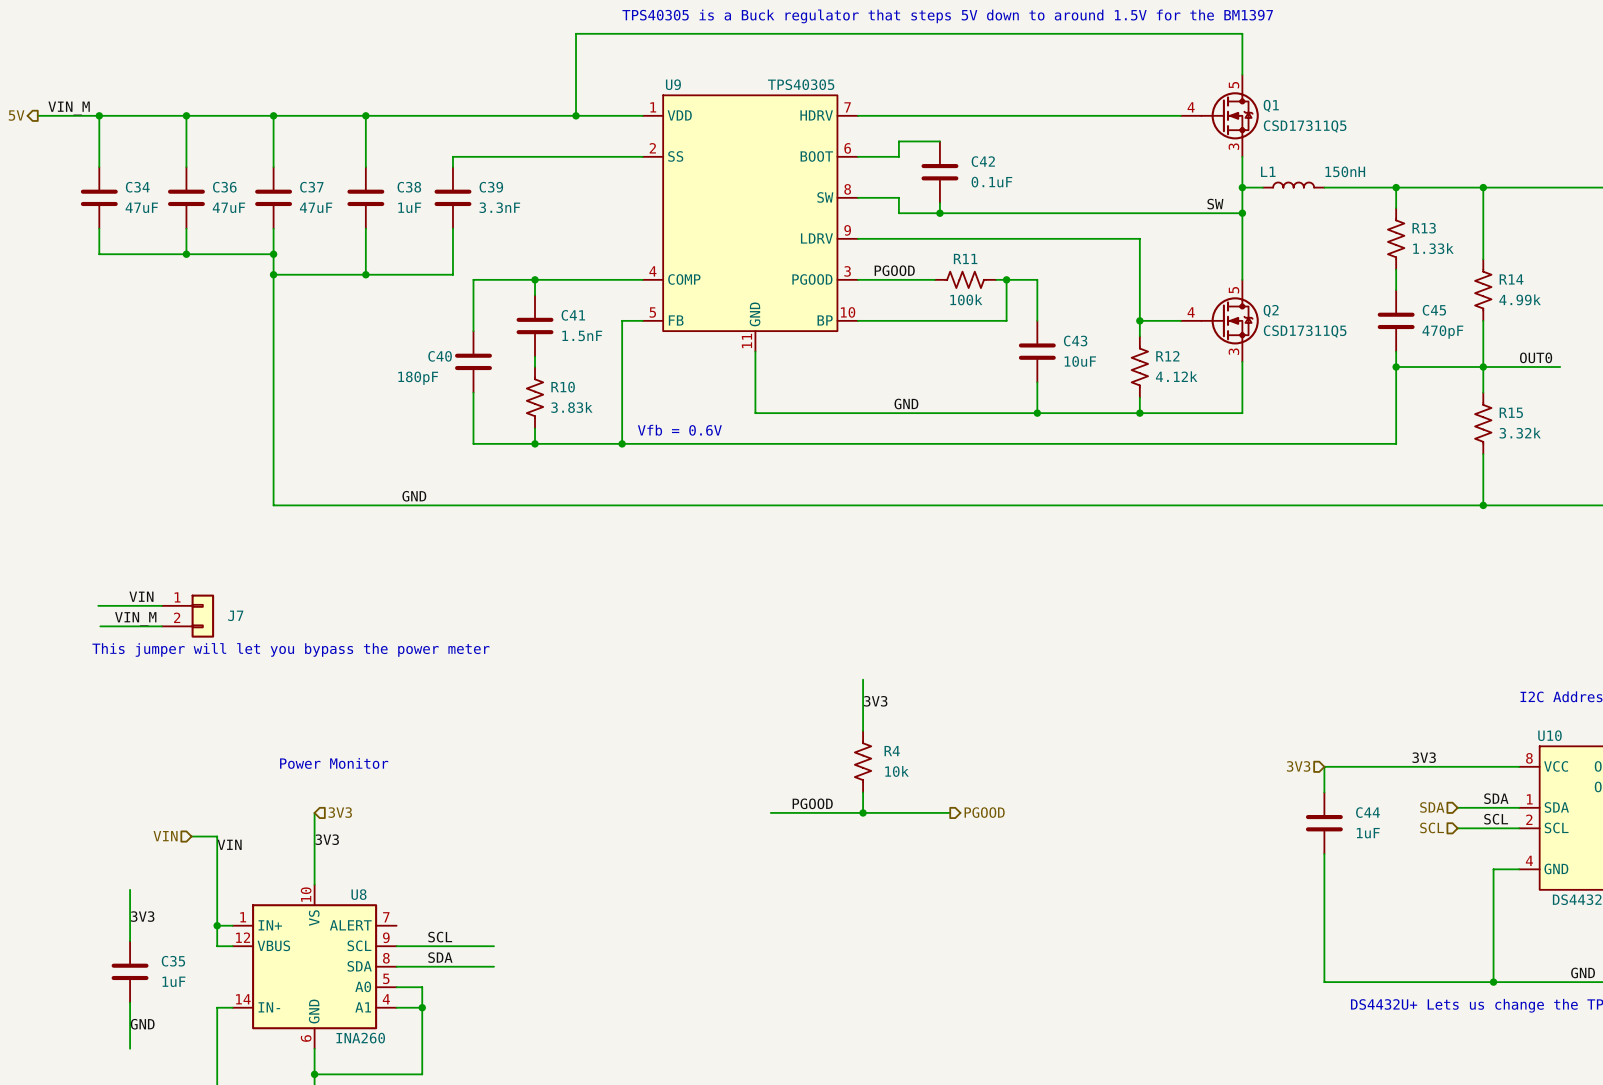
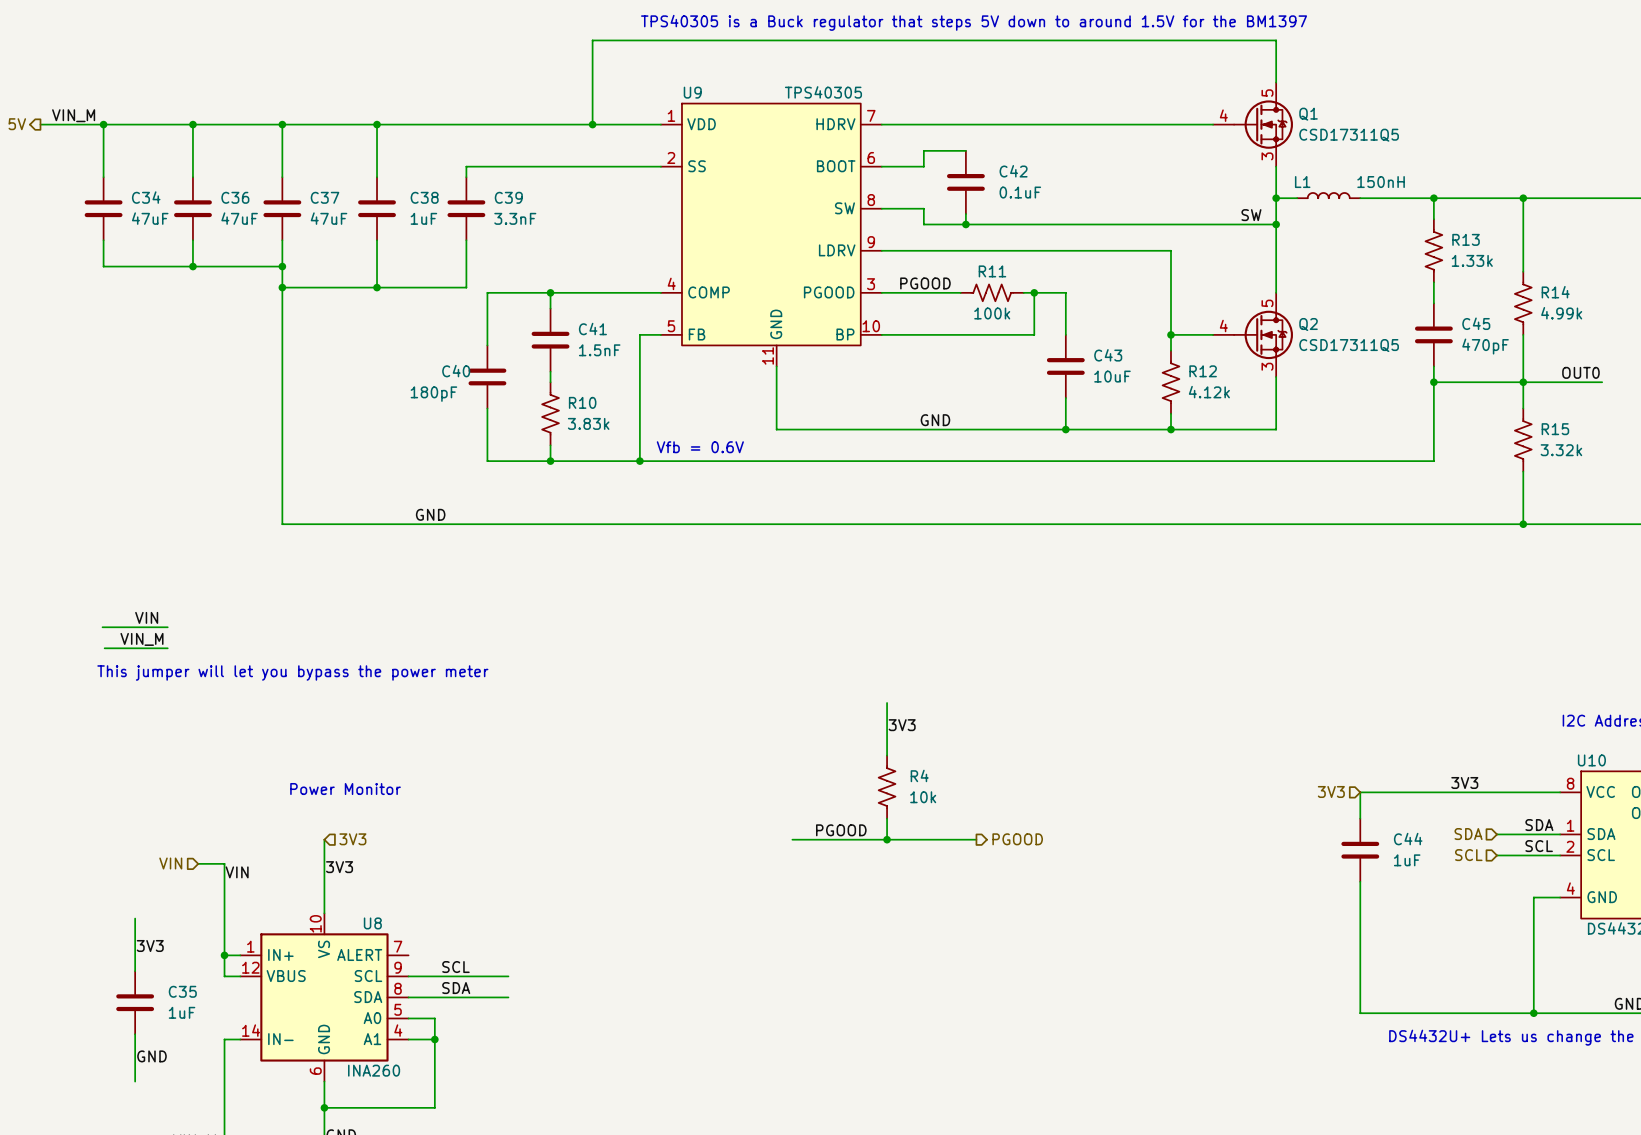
J7: (187, 616) -> none

